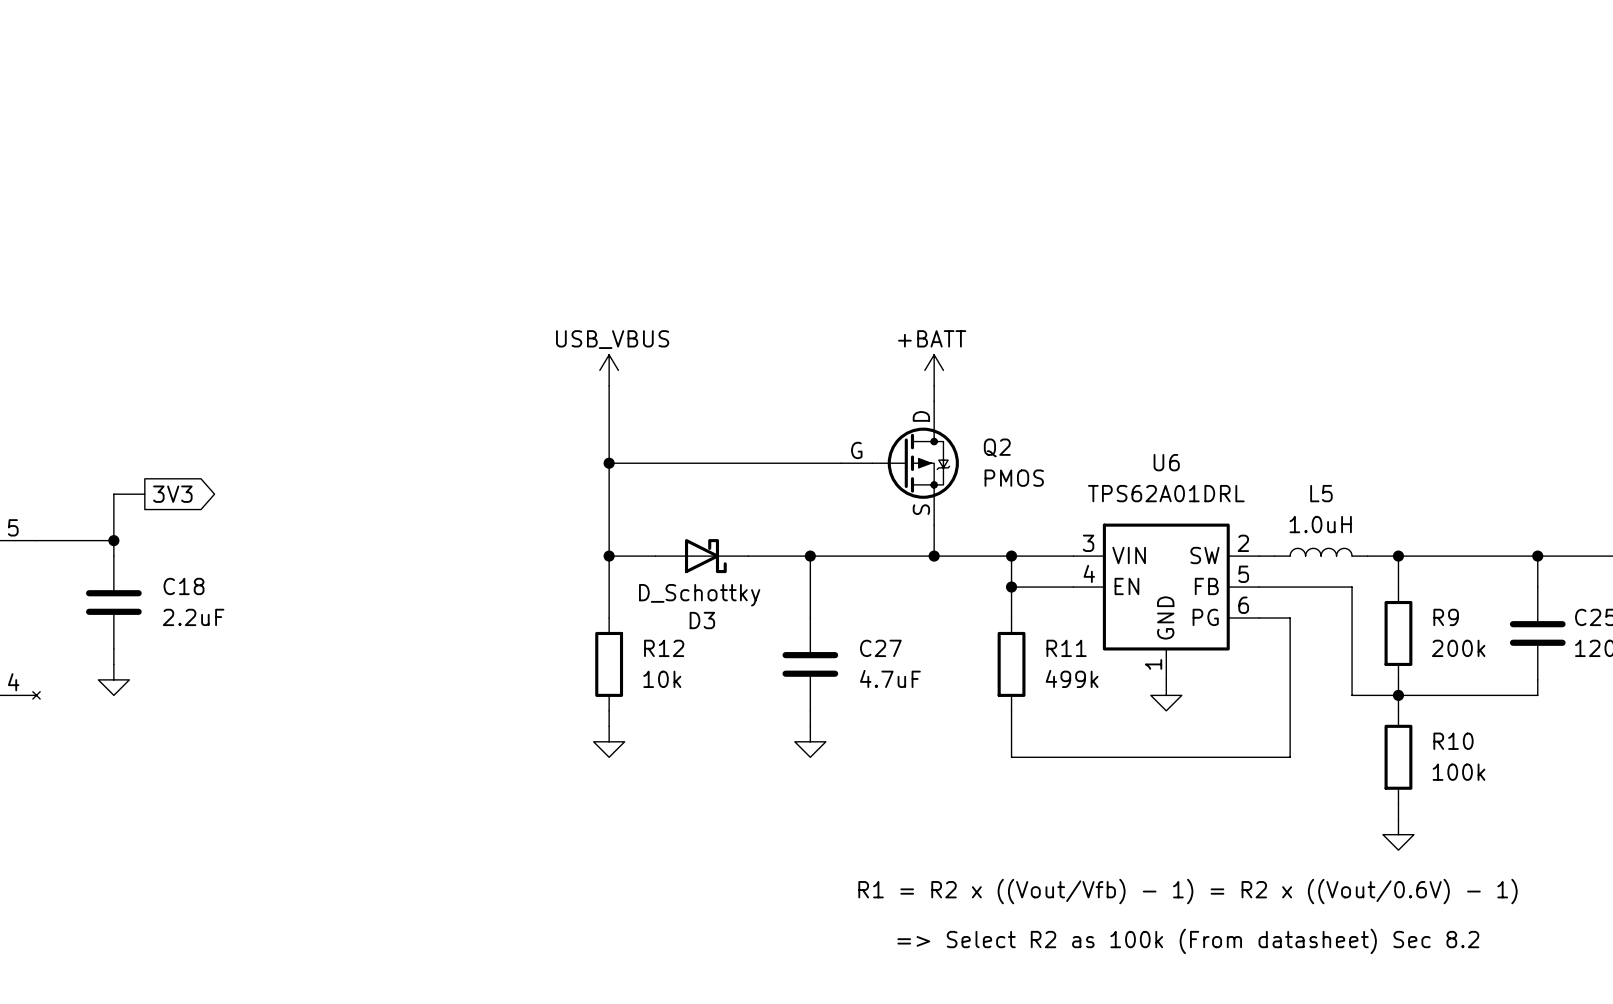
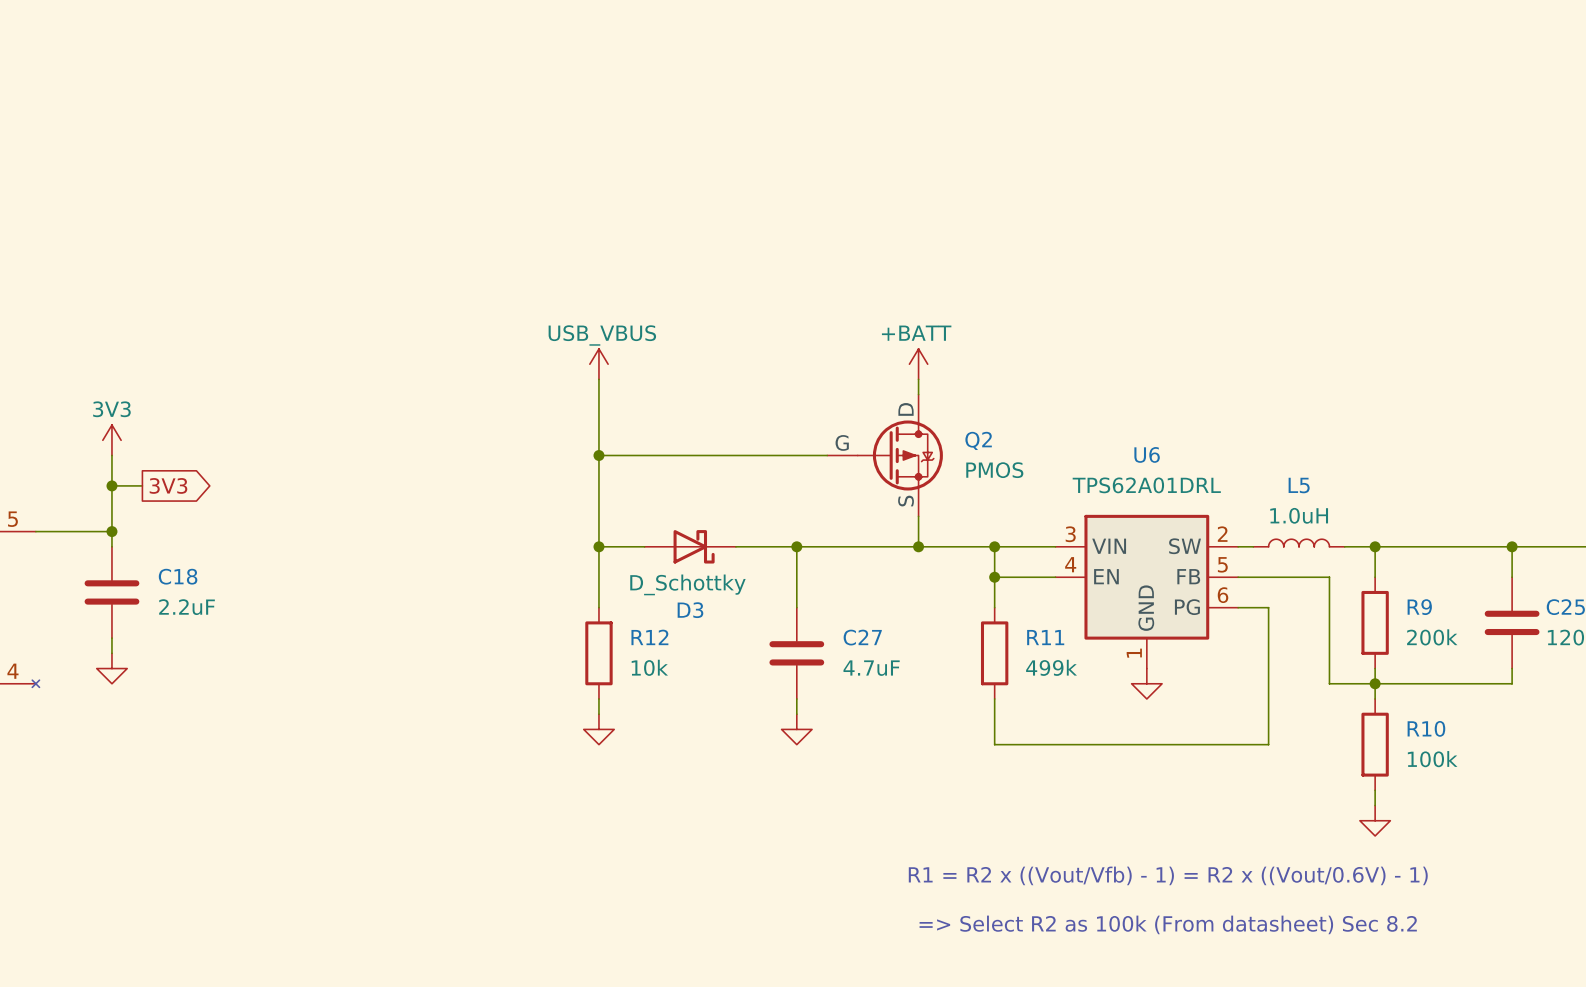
power symbol: none -> 3V3 (111, 440)
wire: none -> (111, 455) (111, 485)
junction: none -> (111, 485)

